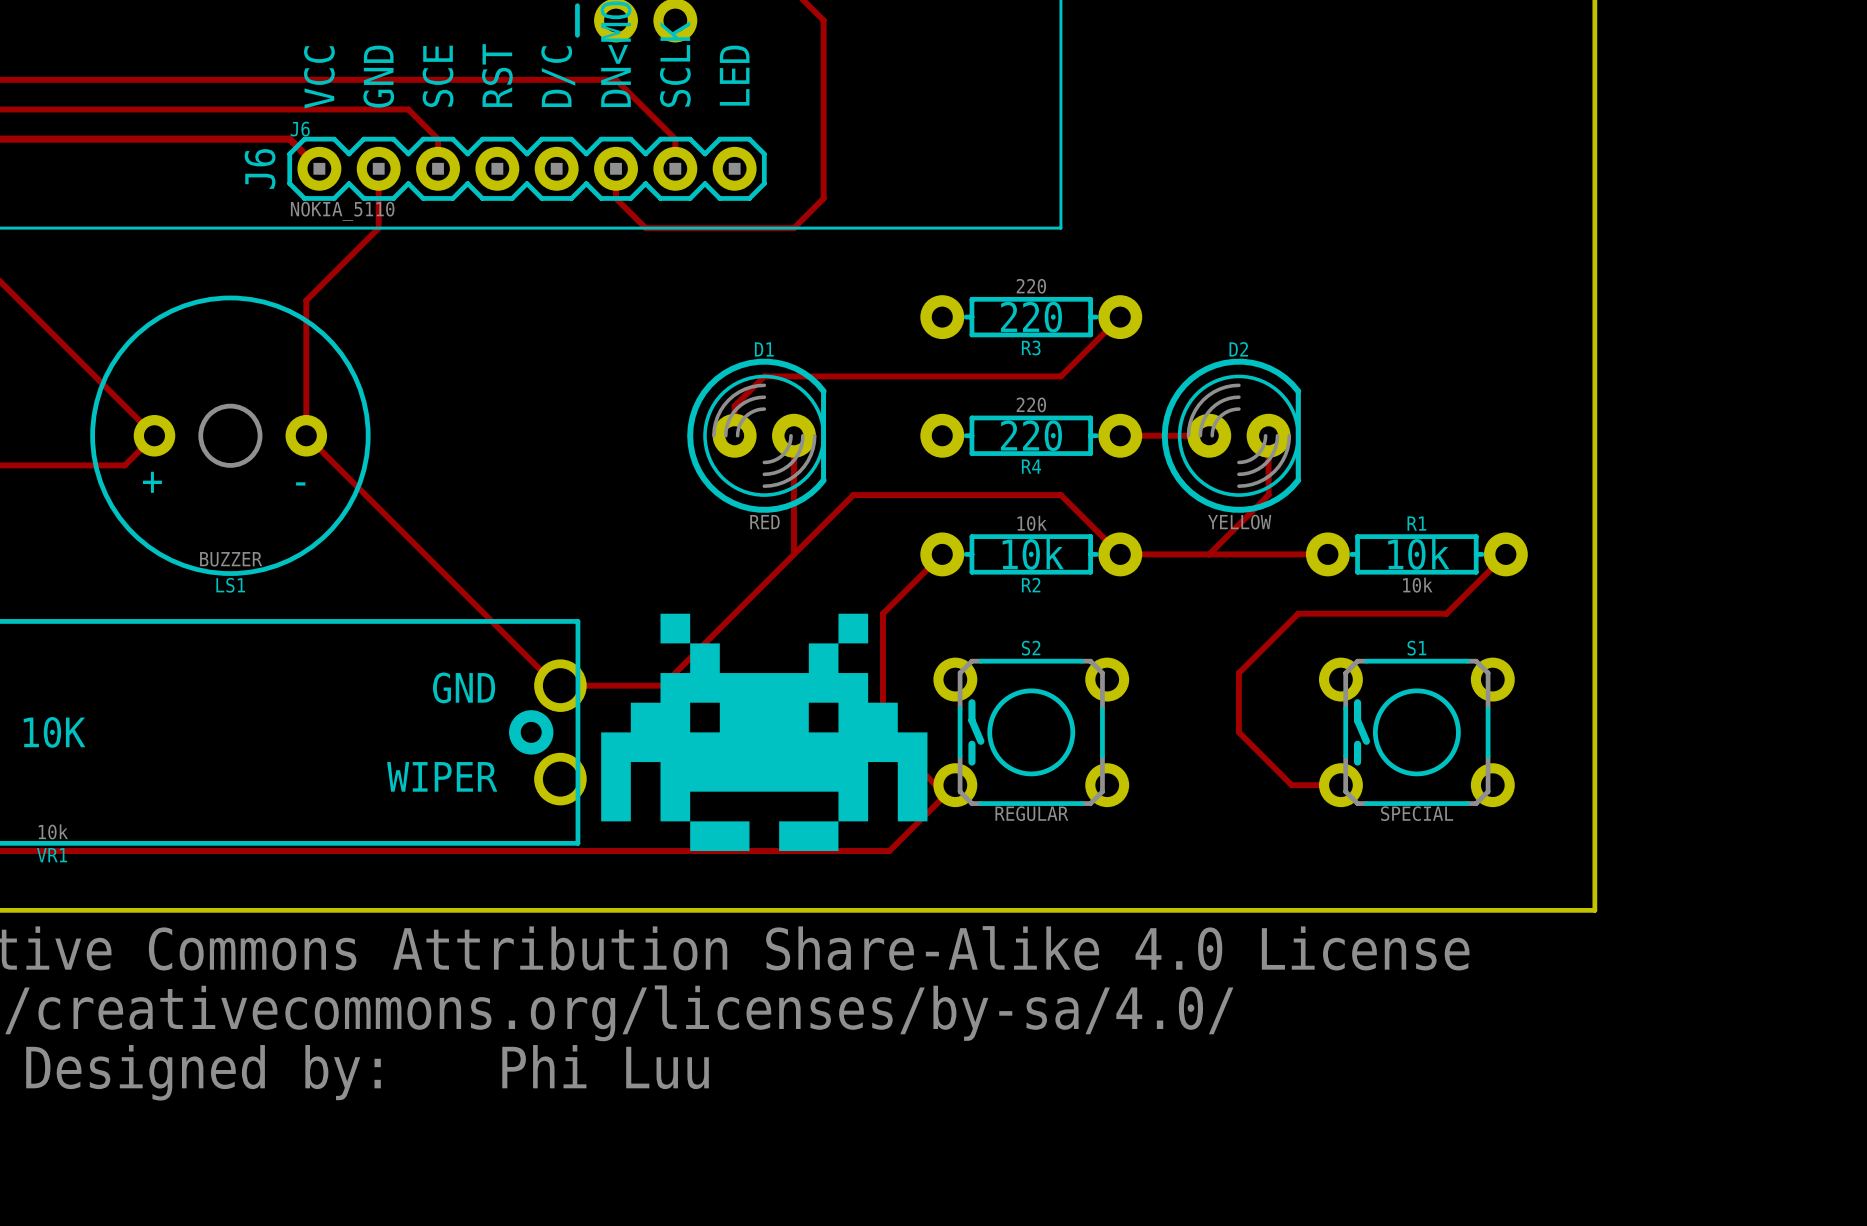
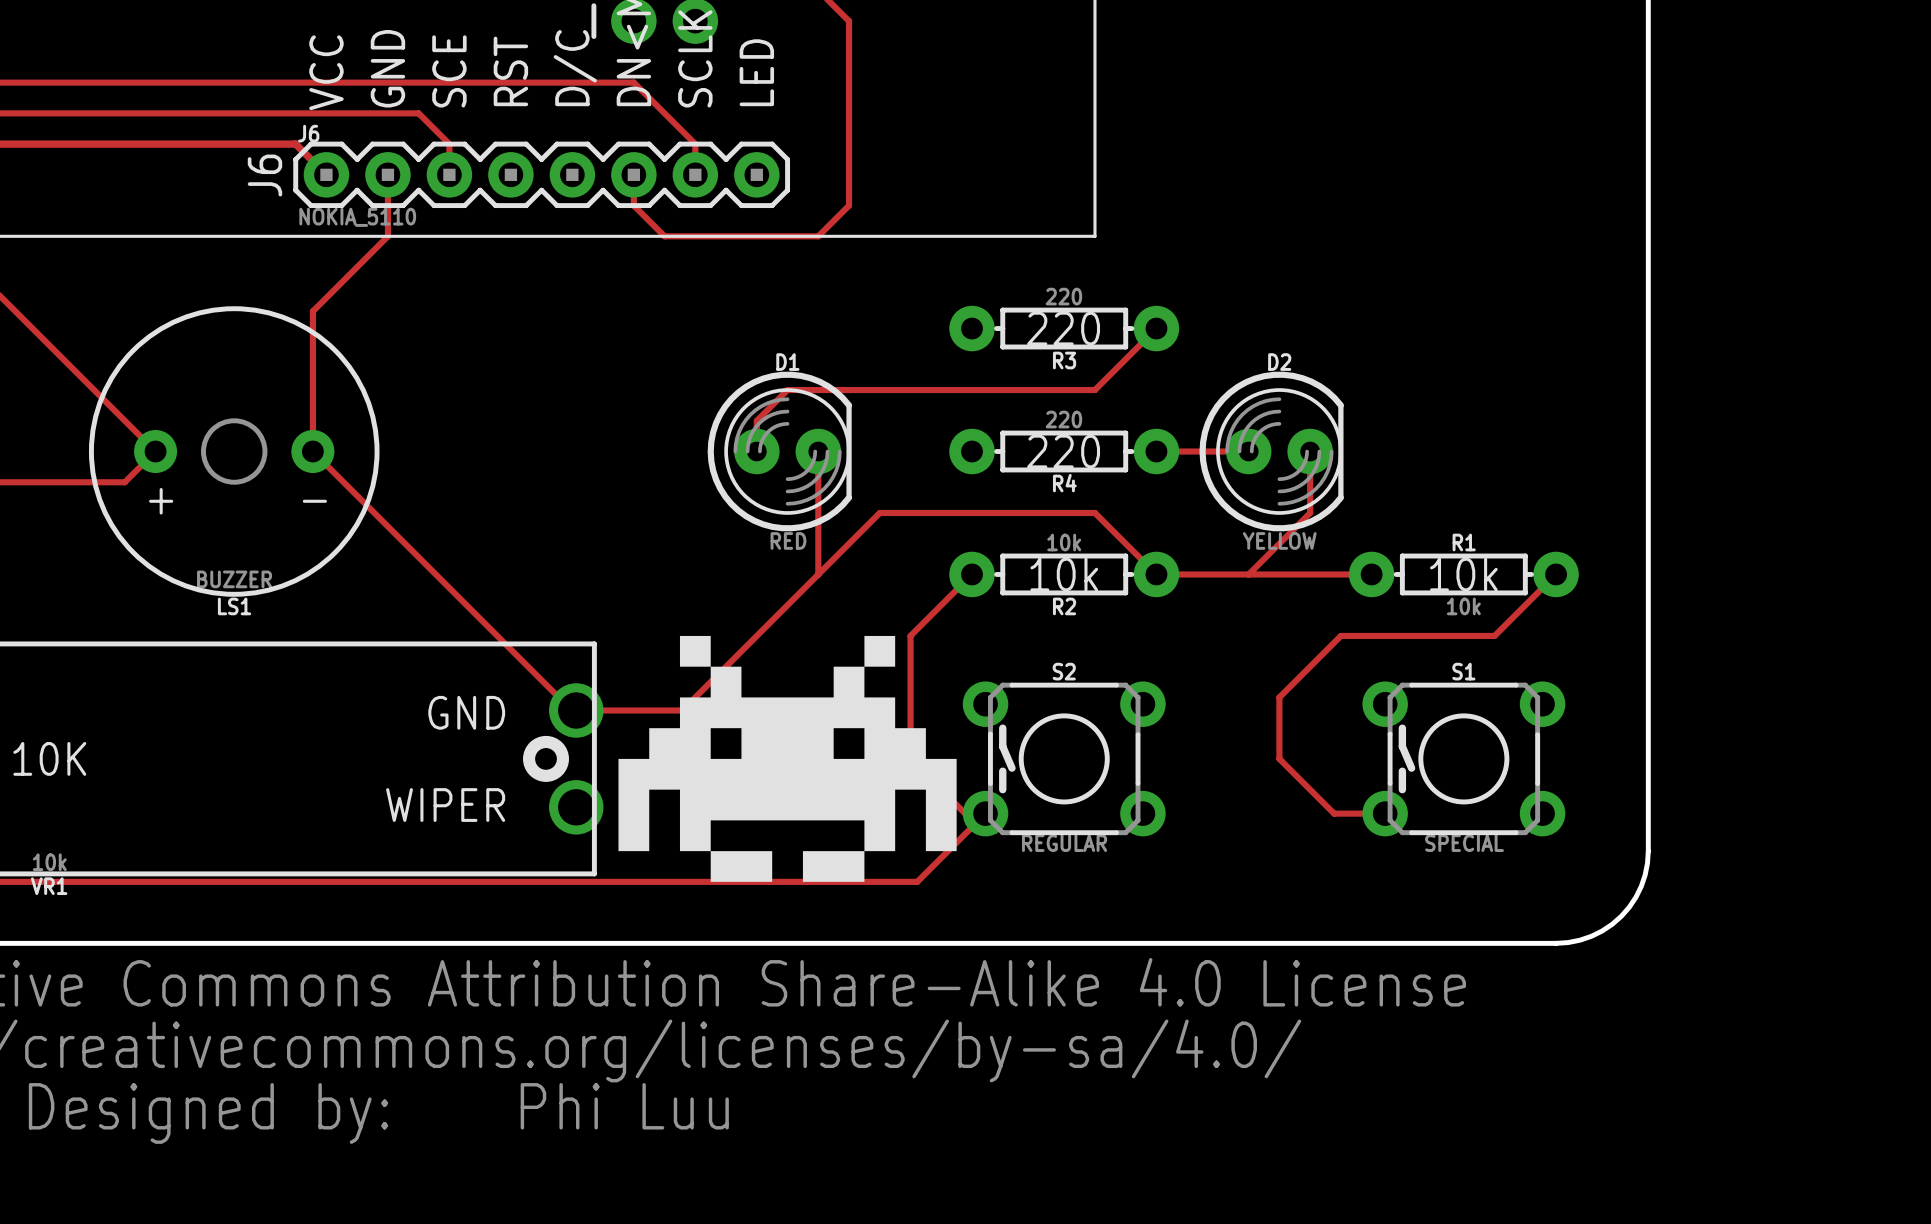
board edge: (1594, 821) (1594, 910) (1505, 910) -> (1648, 851) (1645, 875) (1641, 886) (1635, 897) (1621, 916) (1602, 931) (1591, 936) (1579, 940) (1556, 943)

